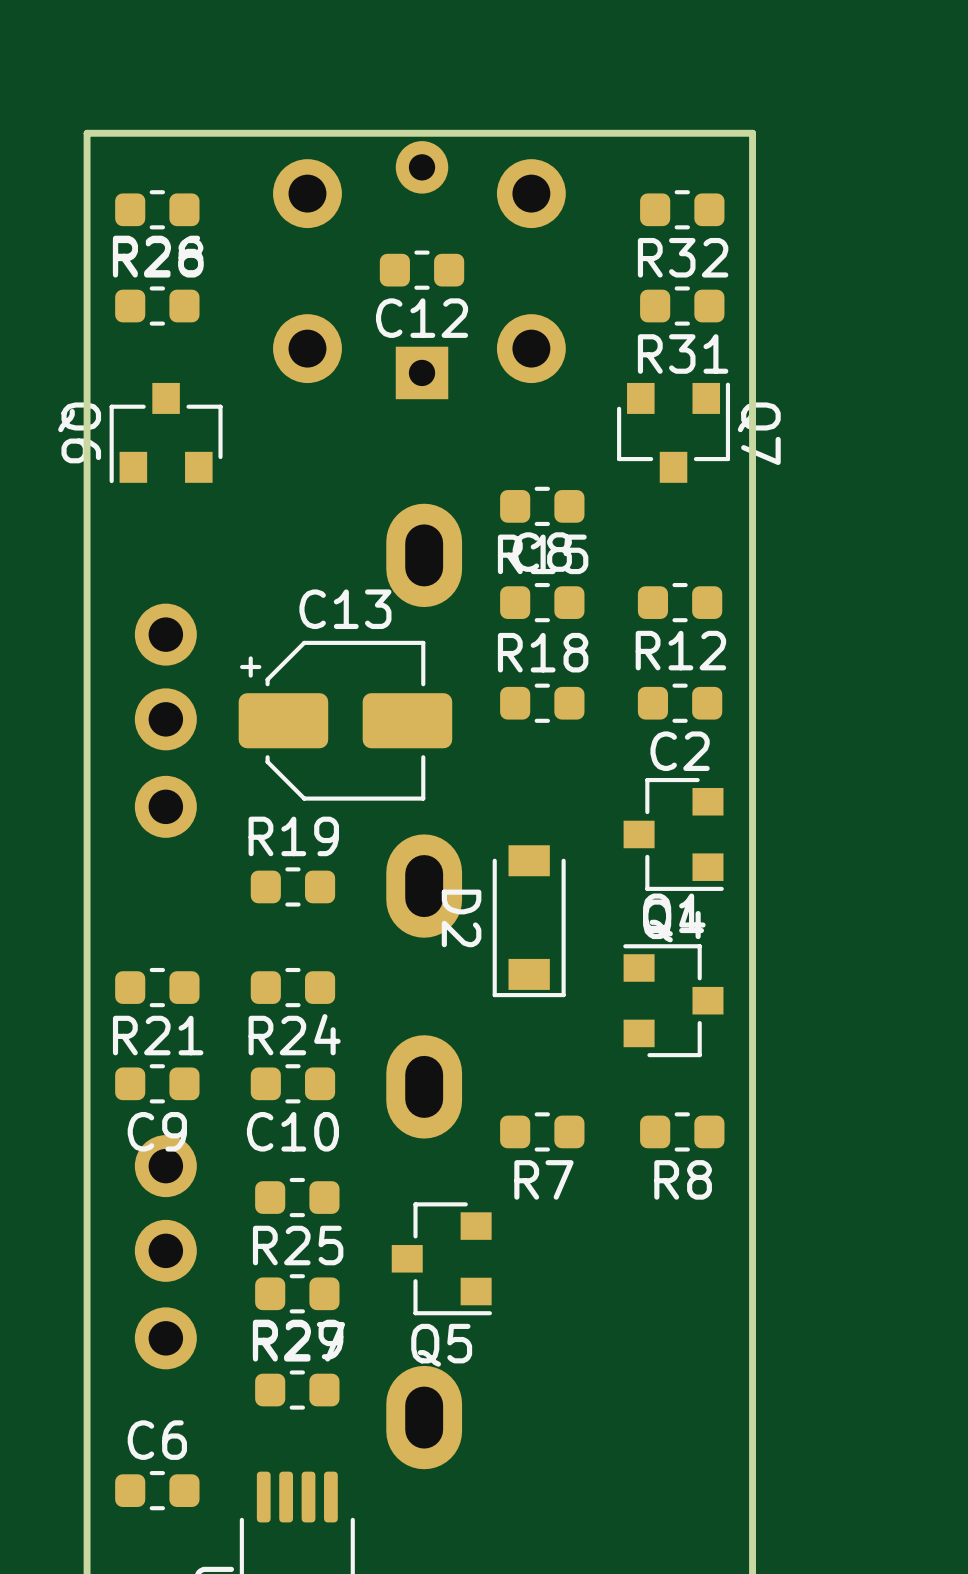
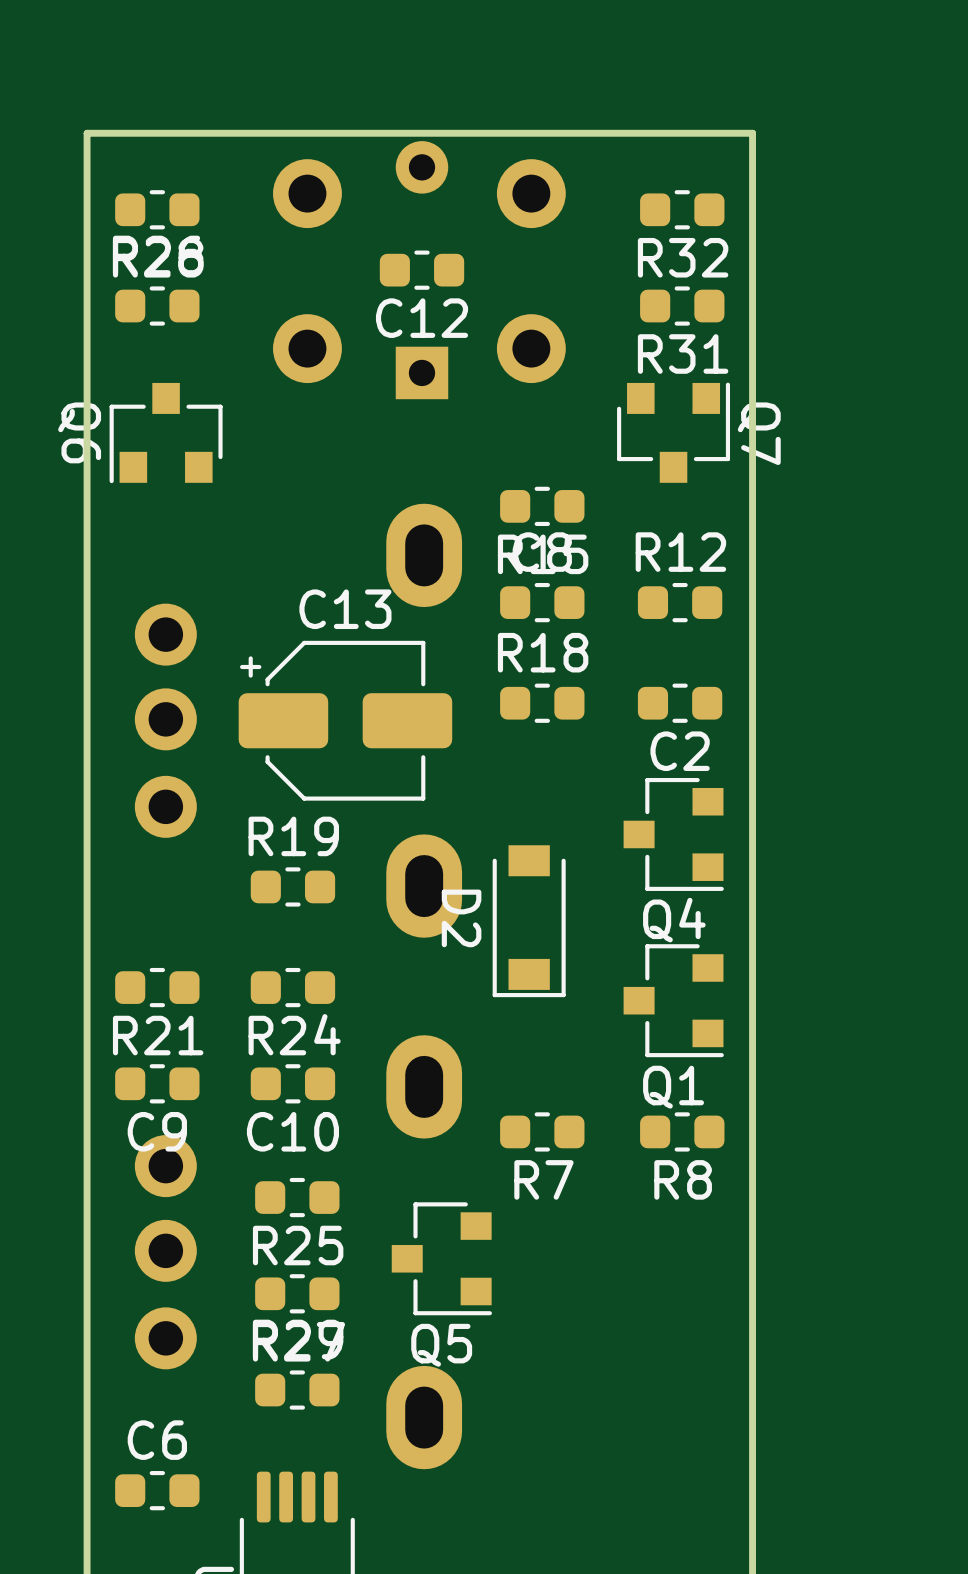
R12 name position: R12 (680, 650) -> R12 (680, 552)
Q1 rotation: 0° (673, 1000) -> 180° (673, 1000)

